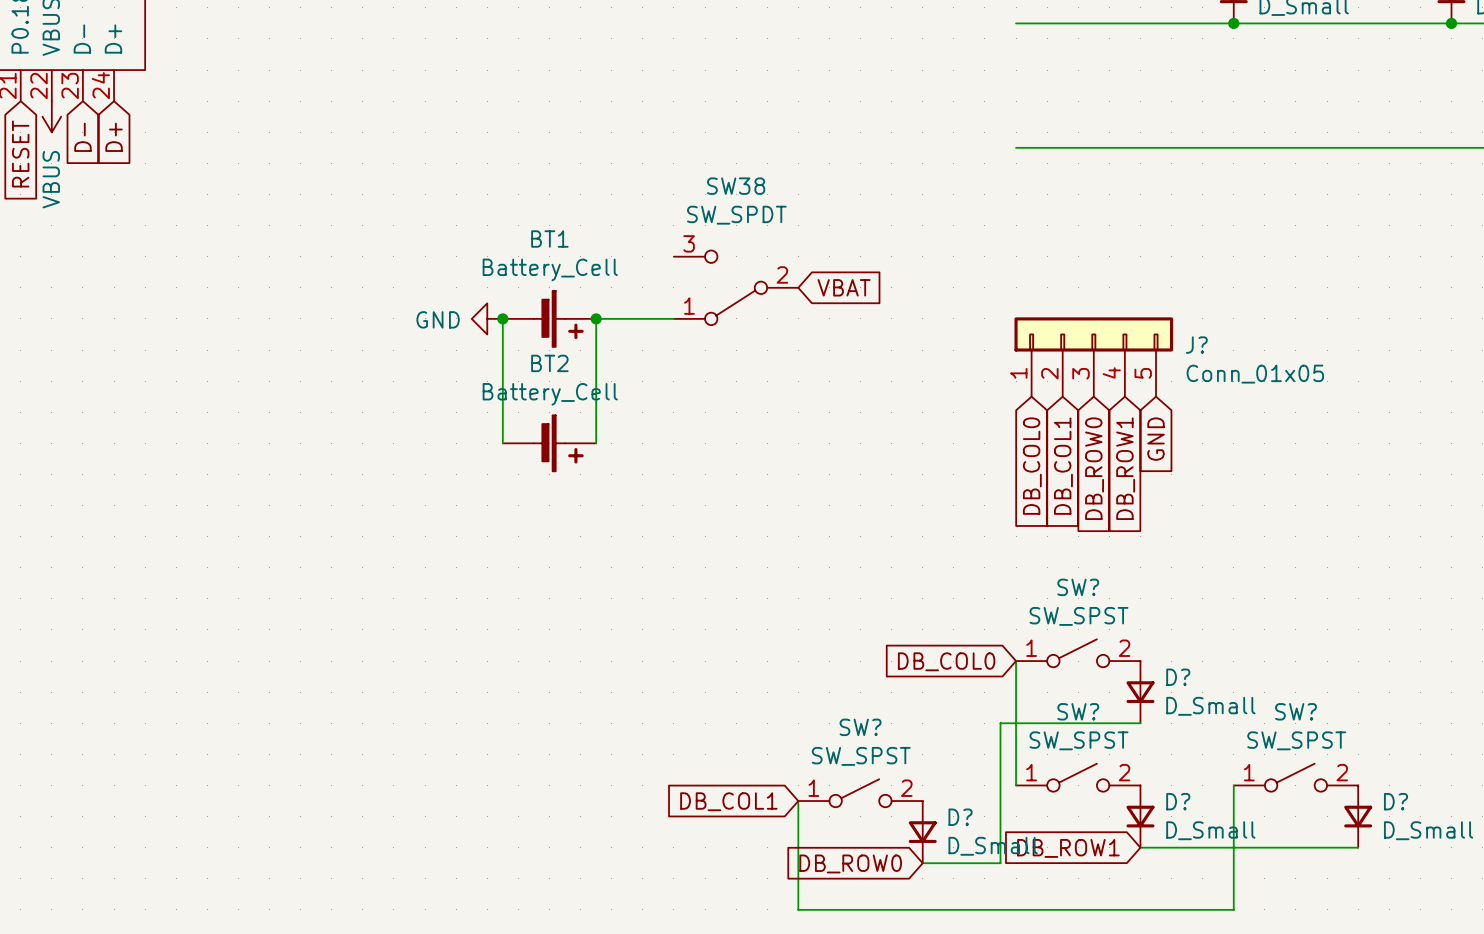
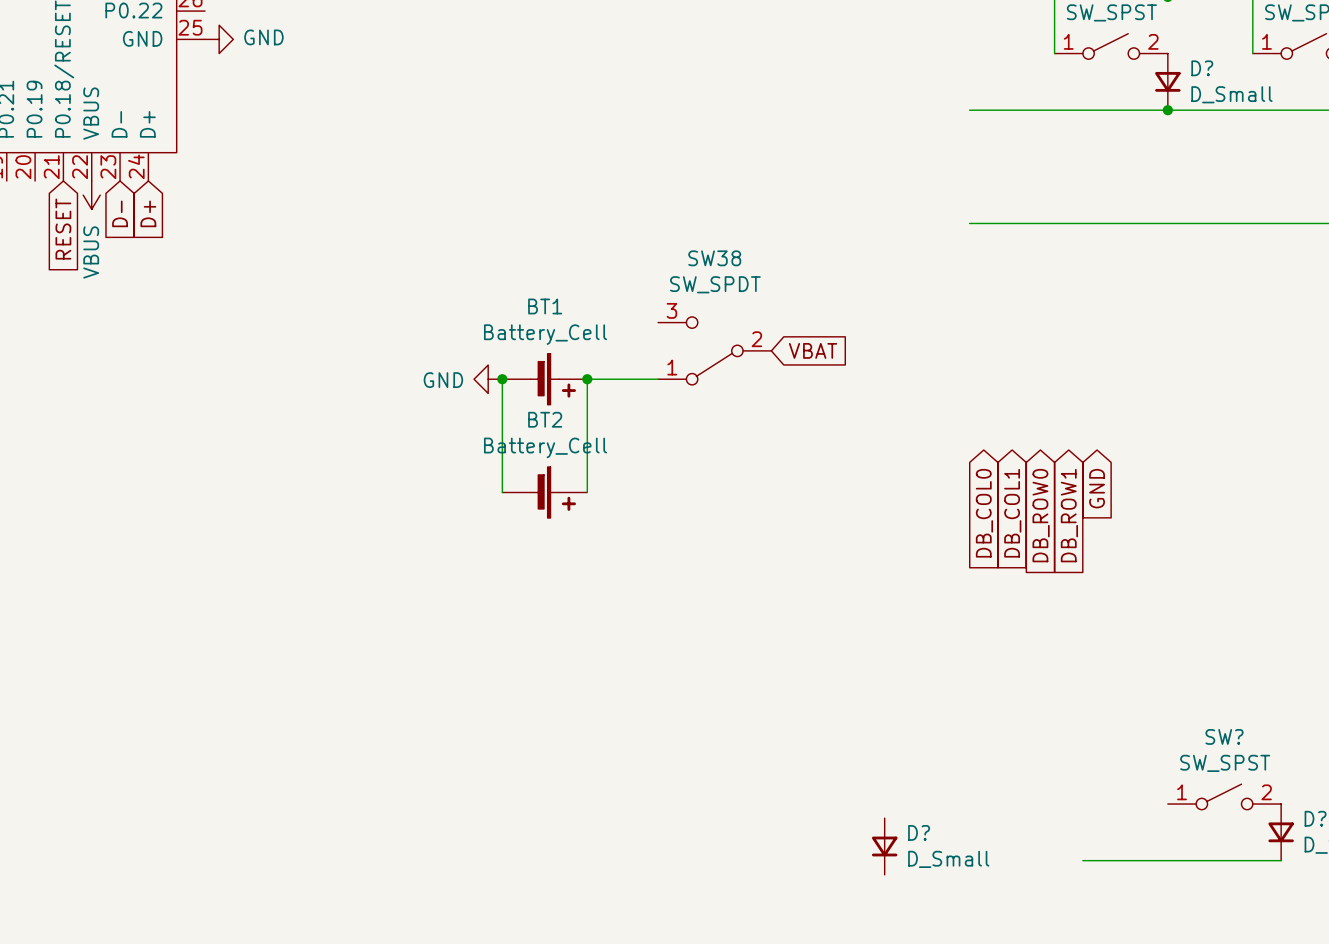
J?: Conn_01x05 (1093, 357) -> none
SW?: SW_SPST (1078, 653) -> none
global label: DB_COL0 (946, 661) -> none
wire: (1016, 661) (1016, 785) -> none
D?: D_Small (1140, 692) -> none
wire: (1140, 723) (1000, 723) (1000, 863) (922, 863) -> none
SW?: SW_SPST (1078, 777) -> none
wire: (1233, 785) (1233, 909) (798, 909) (798, 801) -> none
SW?: SW_SPST (860, 793) -> none
global label: DB_COL1 (728, 801) -> none
D?: D_Small (1140, 816) -> none
global label: DB_ROW1 (1068, 848) -> none
global label: DB_ROW0 (850, 863) -> none

